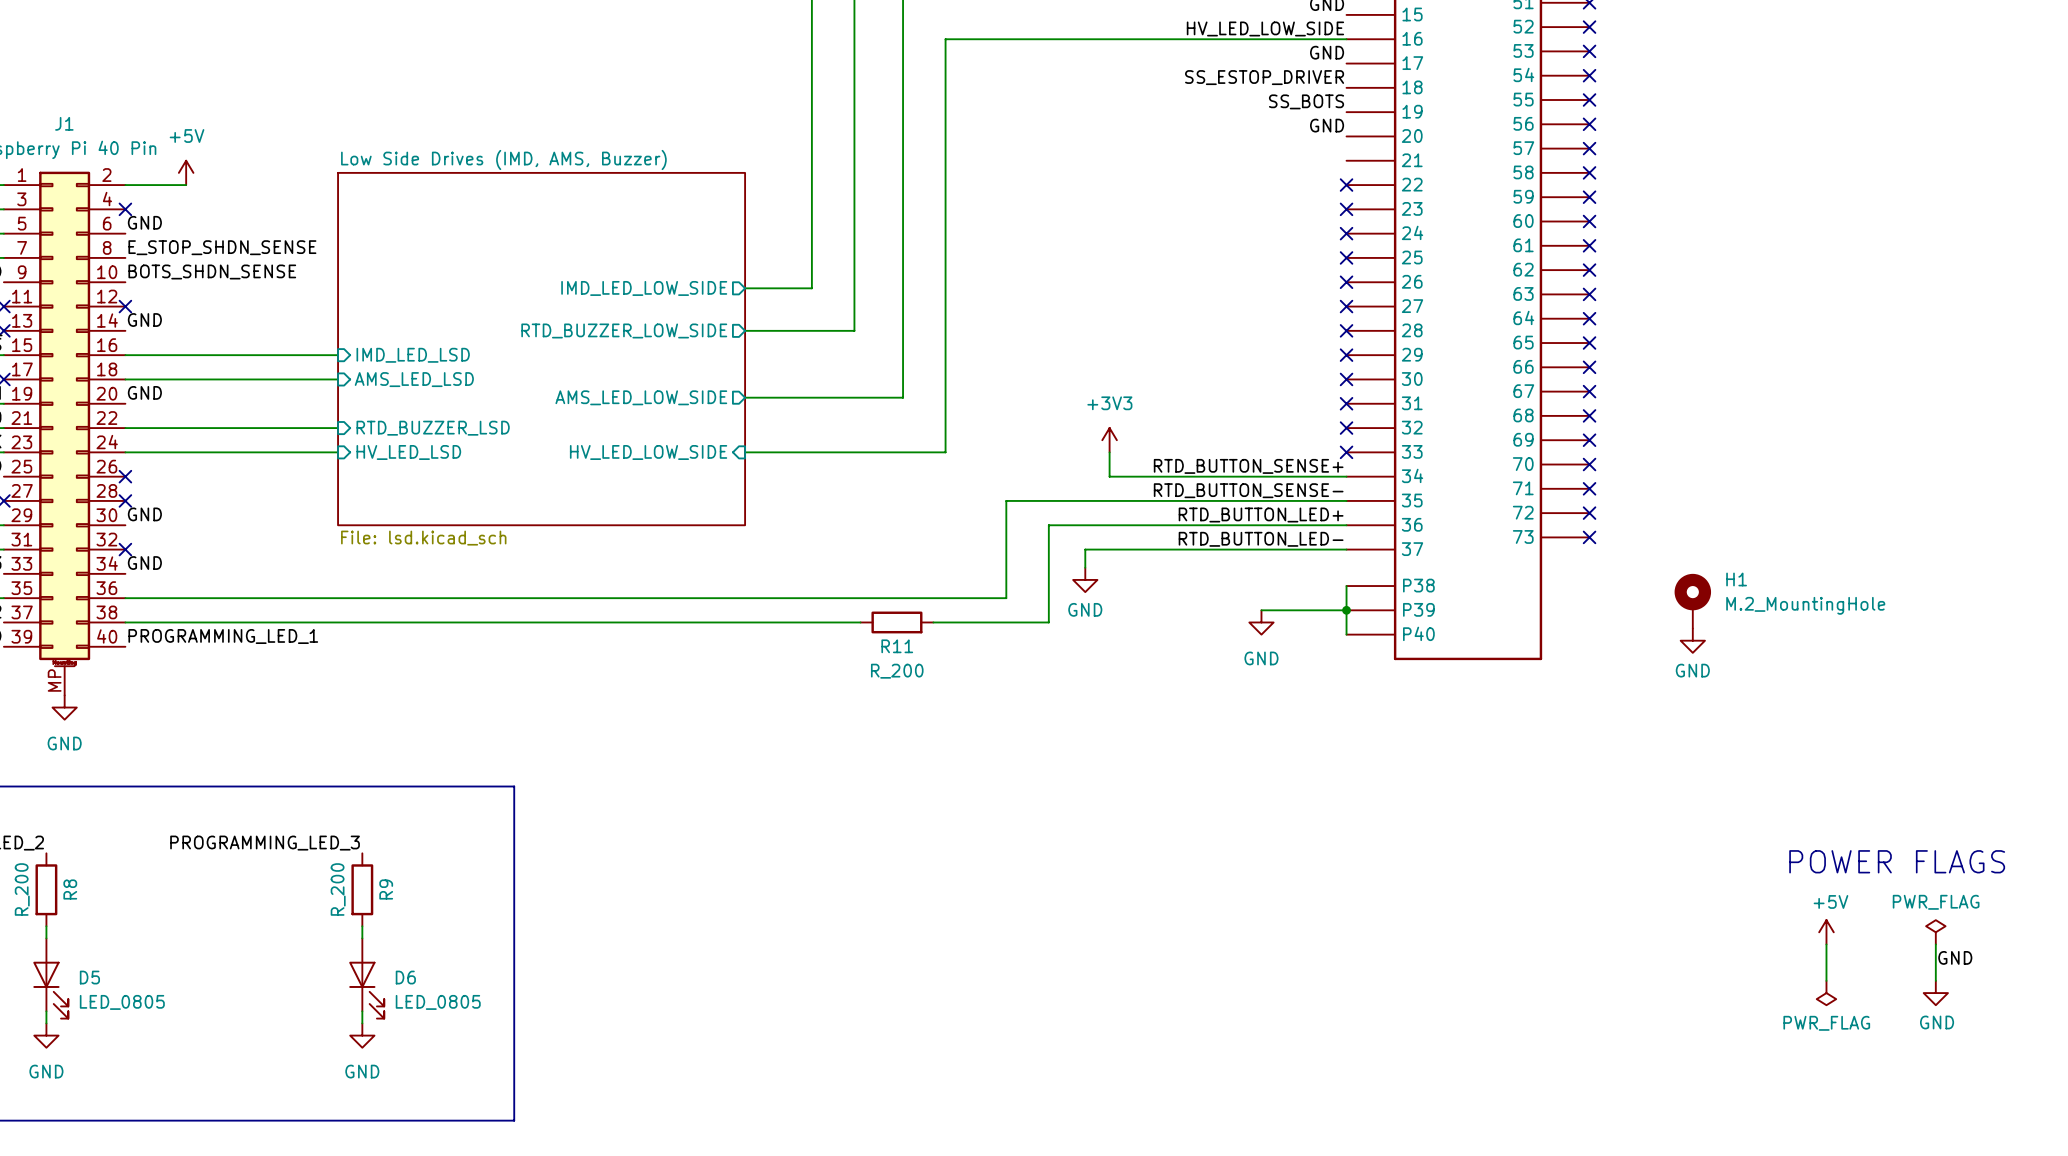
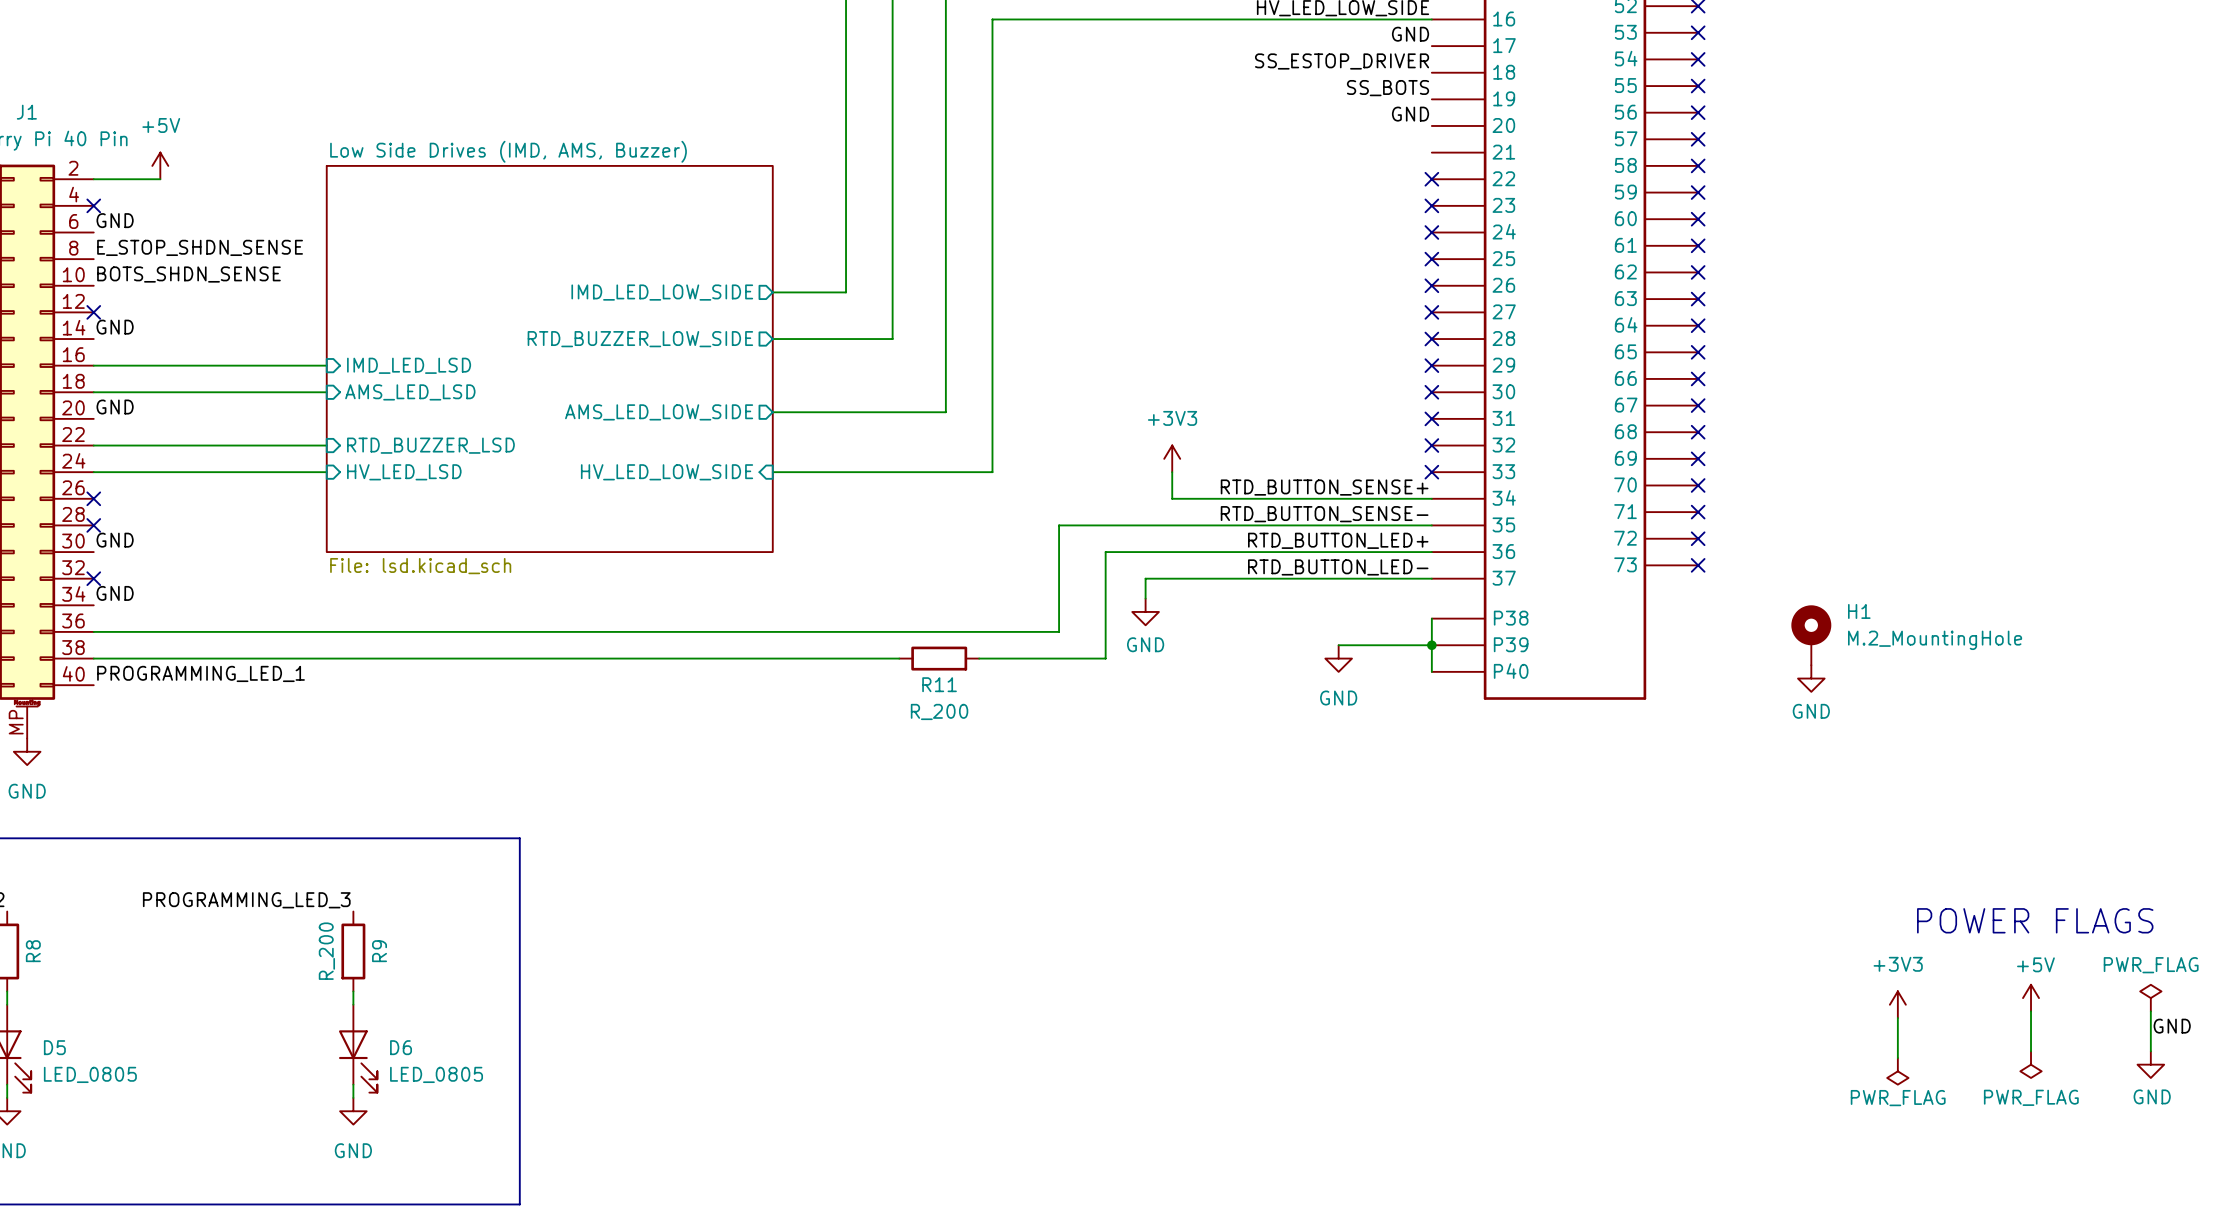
power symbol position: +5V (1826, 932) -> +5V (2031, 998)
power symbol: PWR_FLAG (1935, 932) -> none
power symbol: none -> PWR_FLAG (2150, 998)
power symbol: none -> +3V3 (1897, 1004)
wire: (1826, 944) (1826, 980) -> (1897, 1018) (1897, 1058)
wire: (1935, 944) (1935, 980) -> (2031, 1011) (2031, 1051)
wire: none -> (2150, 1011) (2150, 1051)
label position: GND (1955, 957) -> GND (2172, 1026)
power symbol: PWR_FLAG (1826, 993) -> none
power symbol: none -> PWR_FLAG (2031, 1064)
power symbol position: GND (1935, 993) -> GND (2150, 1064)
power symbol: none -> PWR_FLAG (1897, 1071)

